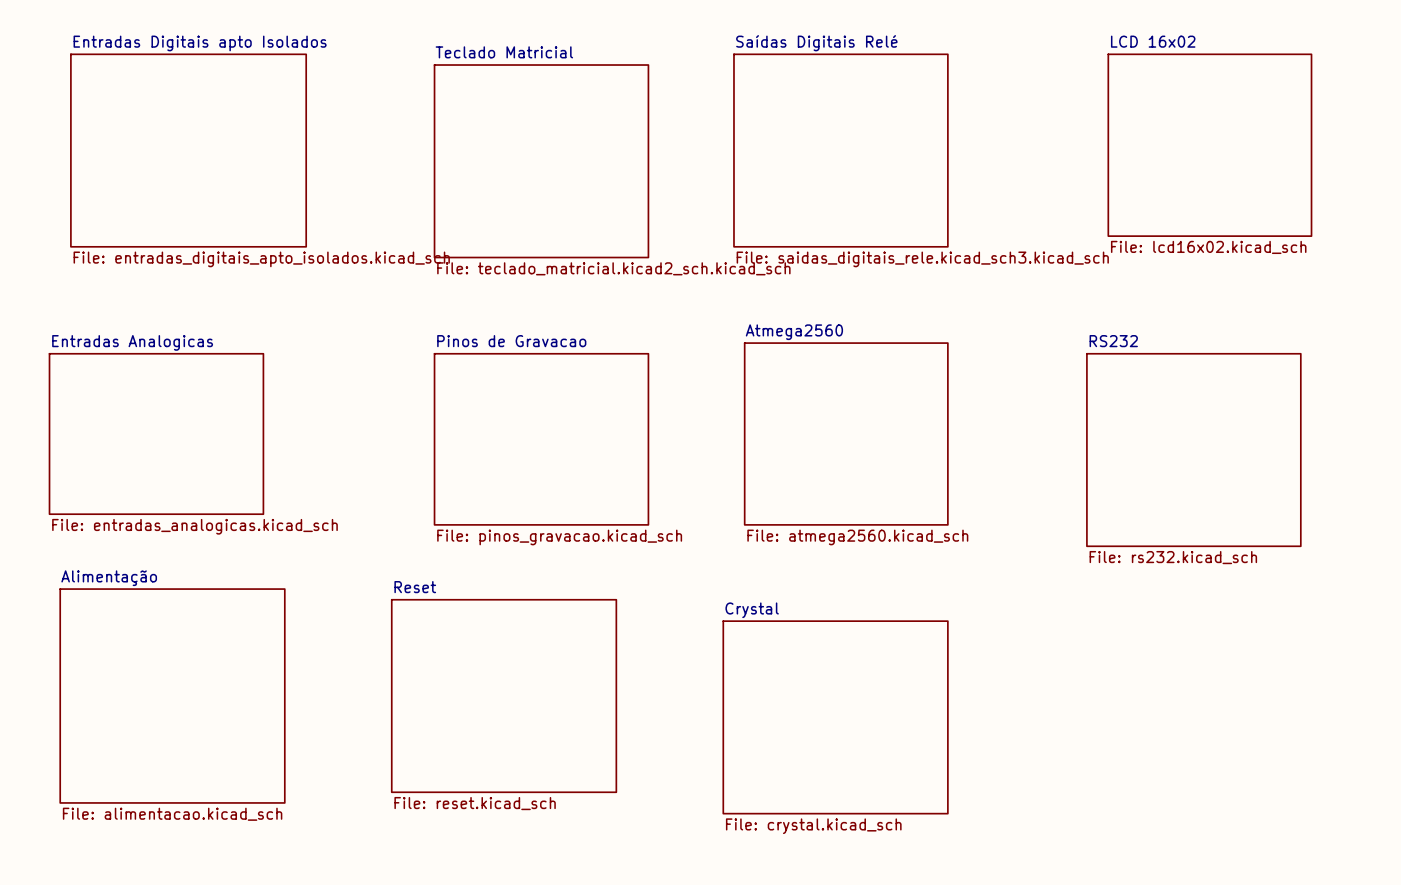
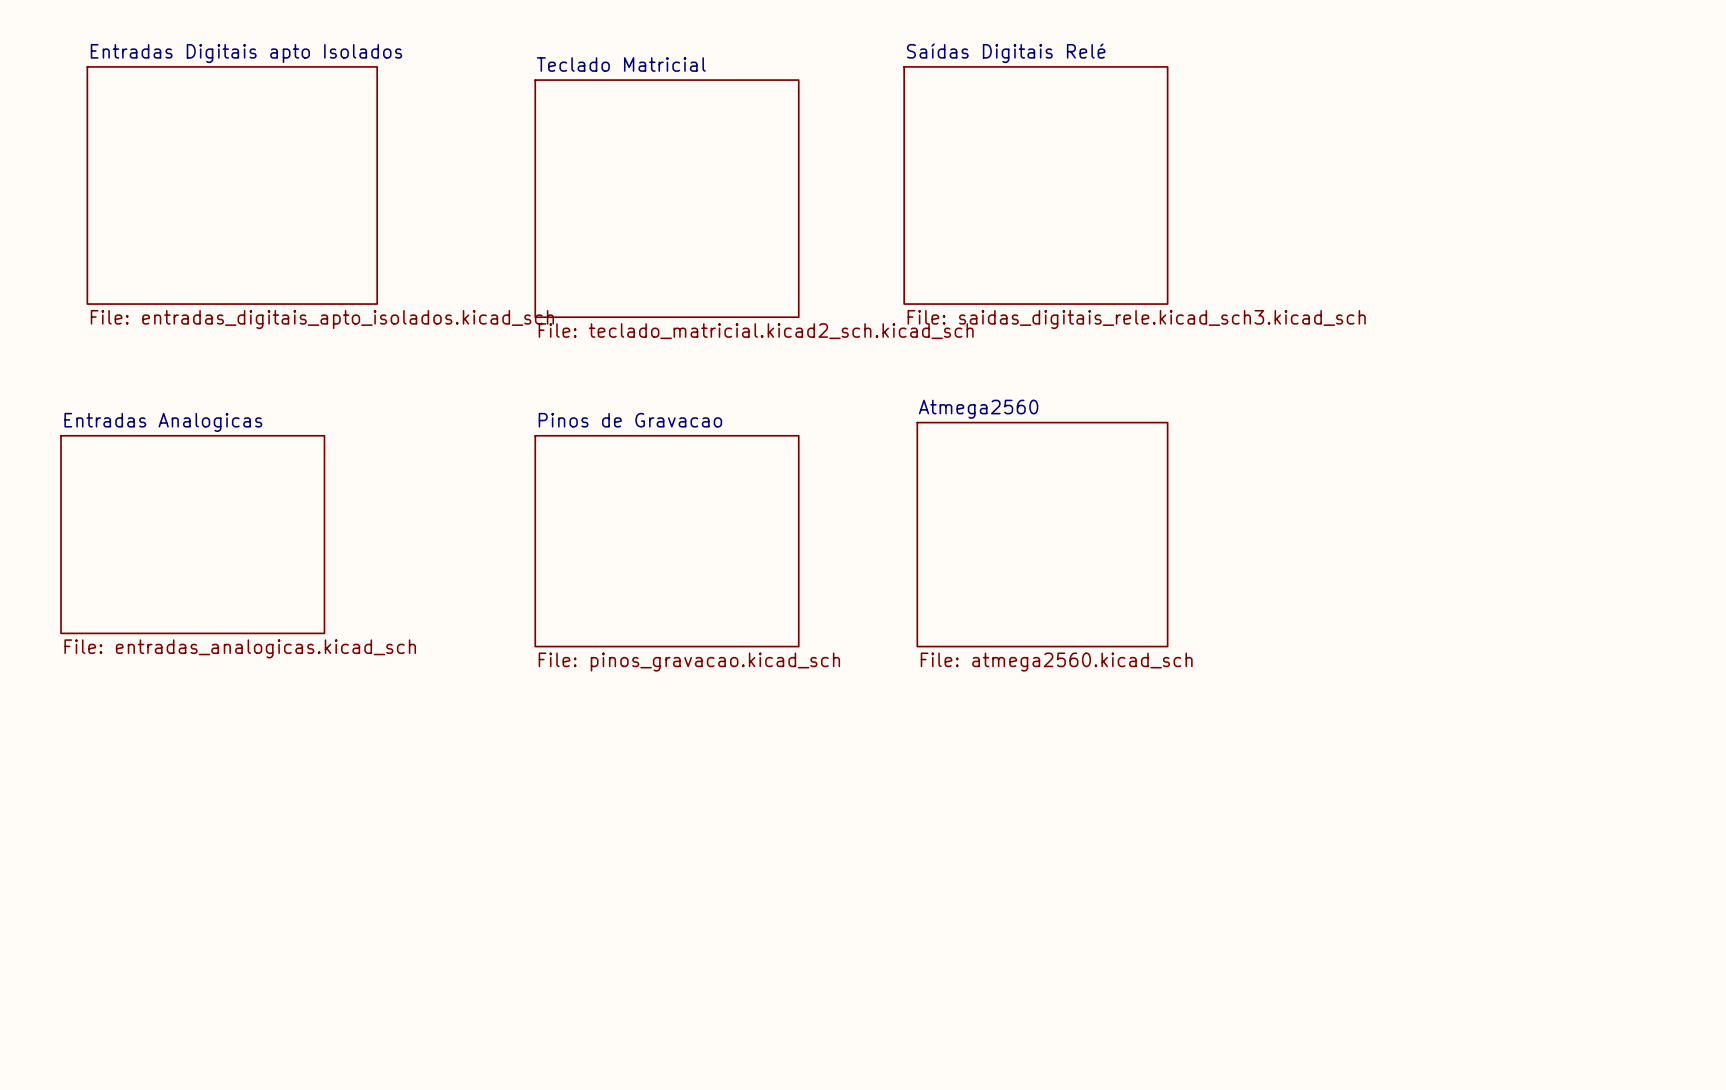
sheet LCD 16x02: File: lcd16x02.kicad_sch (1209, 145) -> none
sheet RS232: File: rs232.kicad_sch (1193, 450) -> none
sheet Alimentação: File: alimentacao.kicad_sch (172, 696) -> none
sheet Reset: File: reset.kicad_sch (504, 696) -> none
sheet Crystal: File: crystal.kicad_sch (835, 717) -> none

